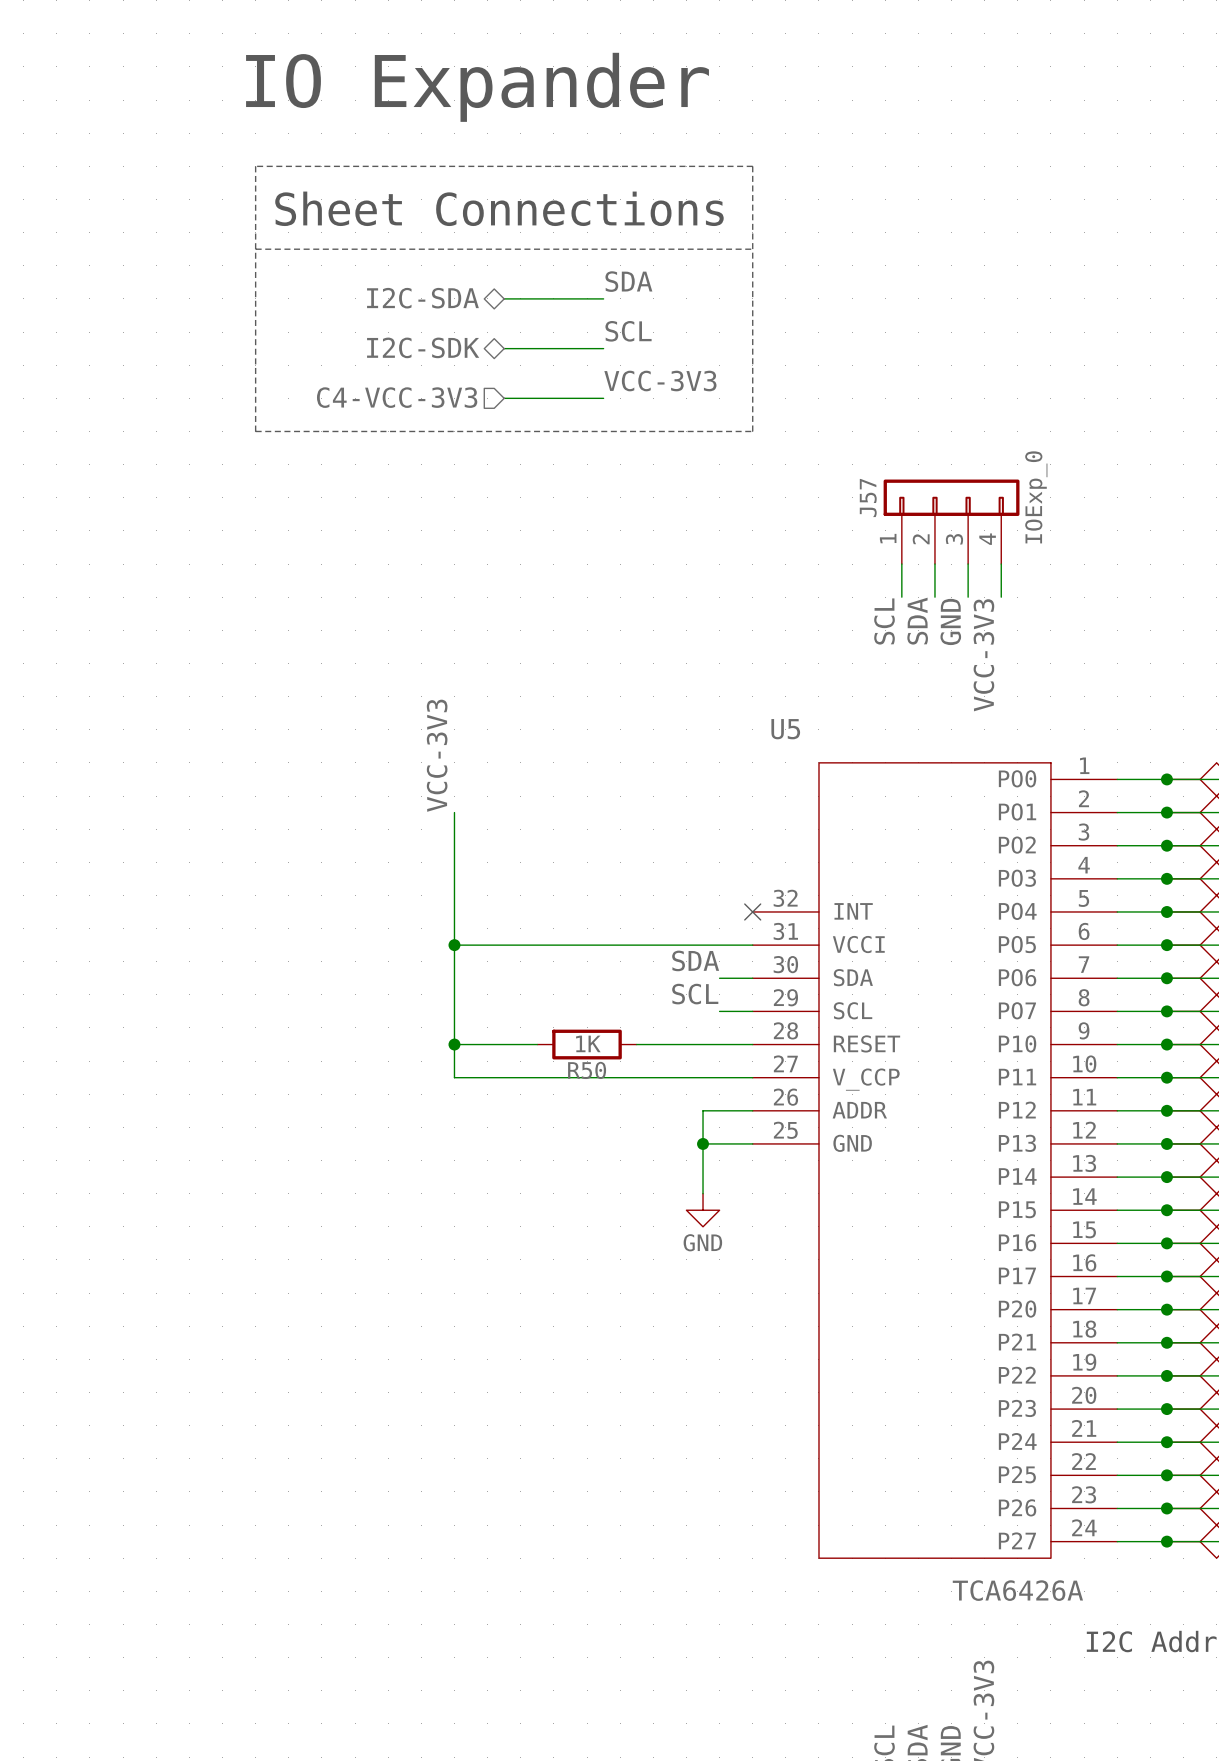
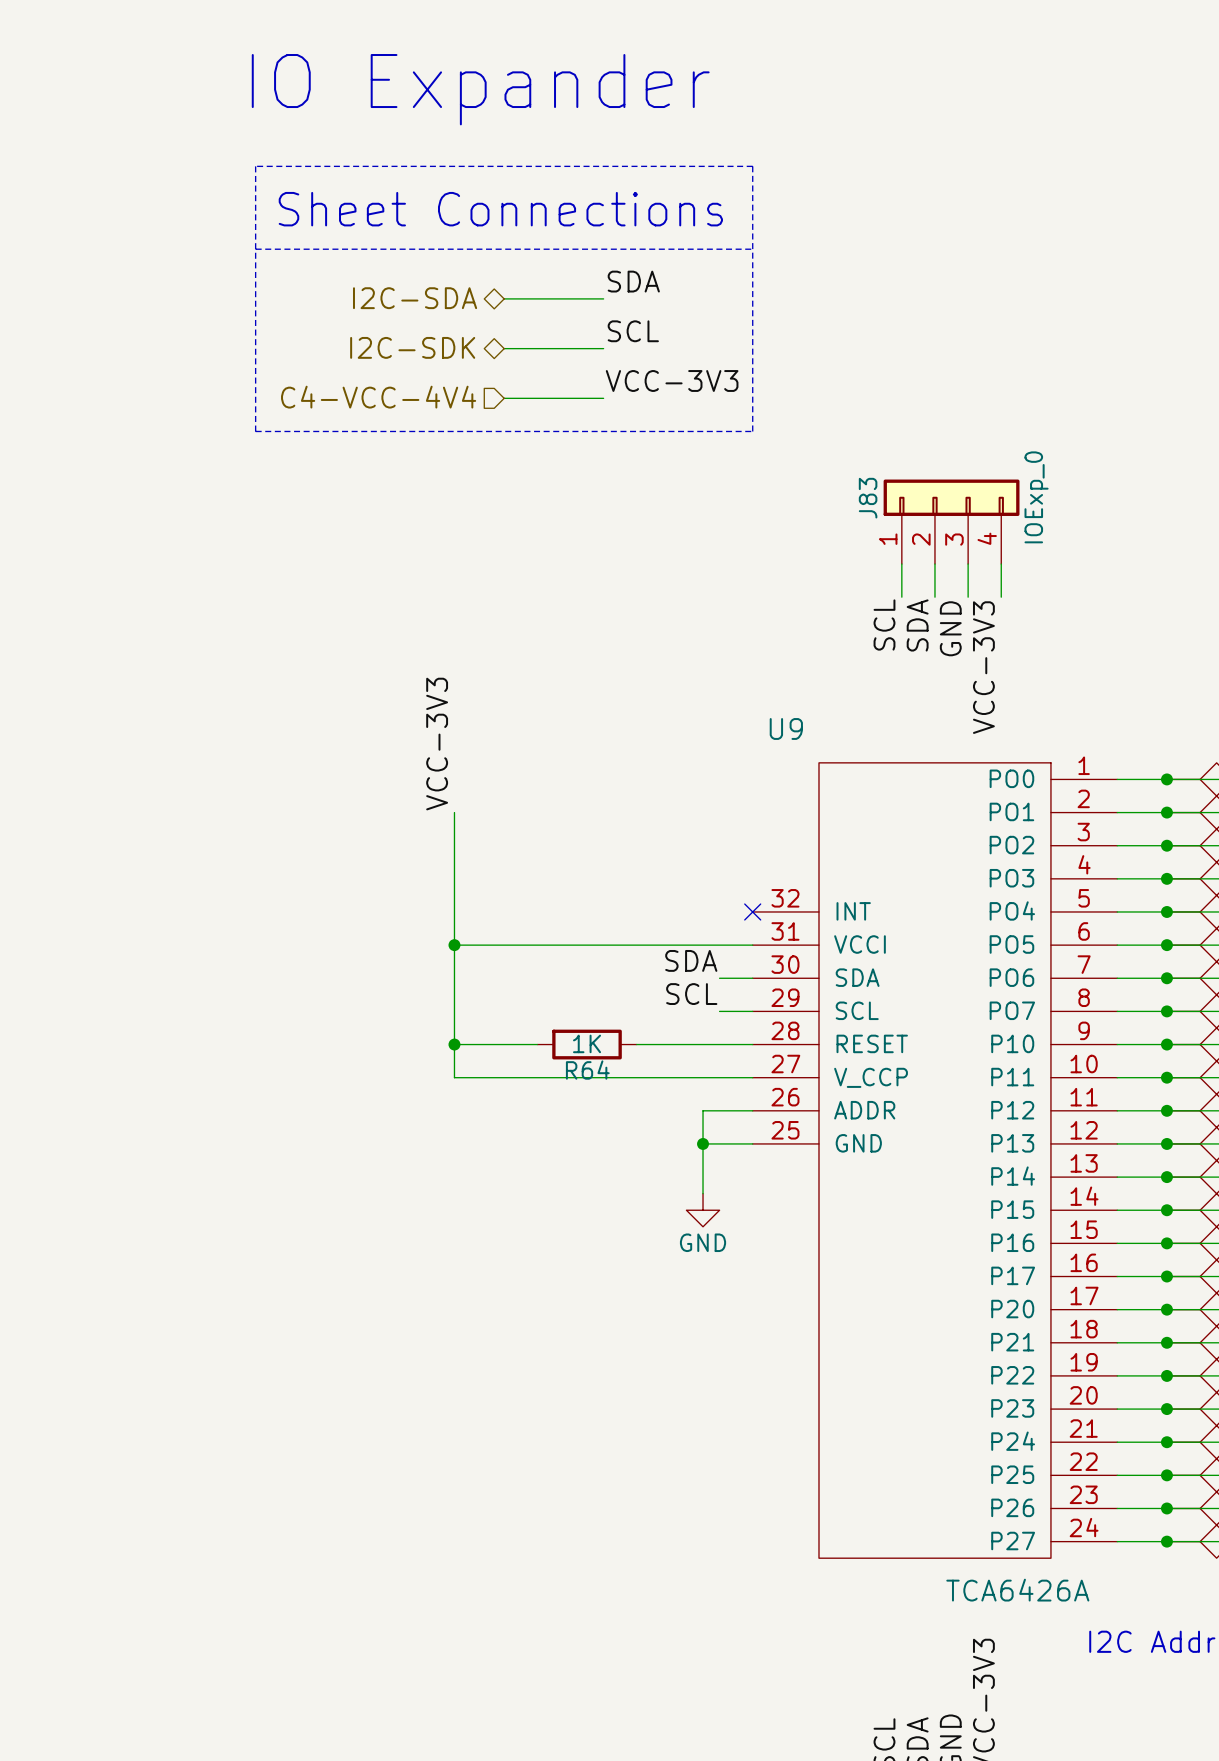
hierarchical label: C4-VCC-3V3 (397, 397) -> C4-VCC-4V4 (378, 397)
J57 name: J57 (868, 498) -> J83 (868, 498)
U5 name: U5 (785, 729) -> U9 (786, 728)
R50 name: R50 (587, 1070) -> R64 (587, 1070)

